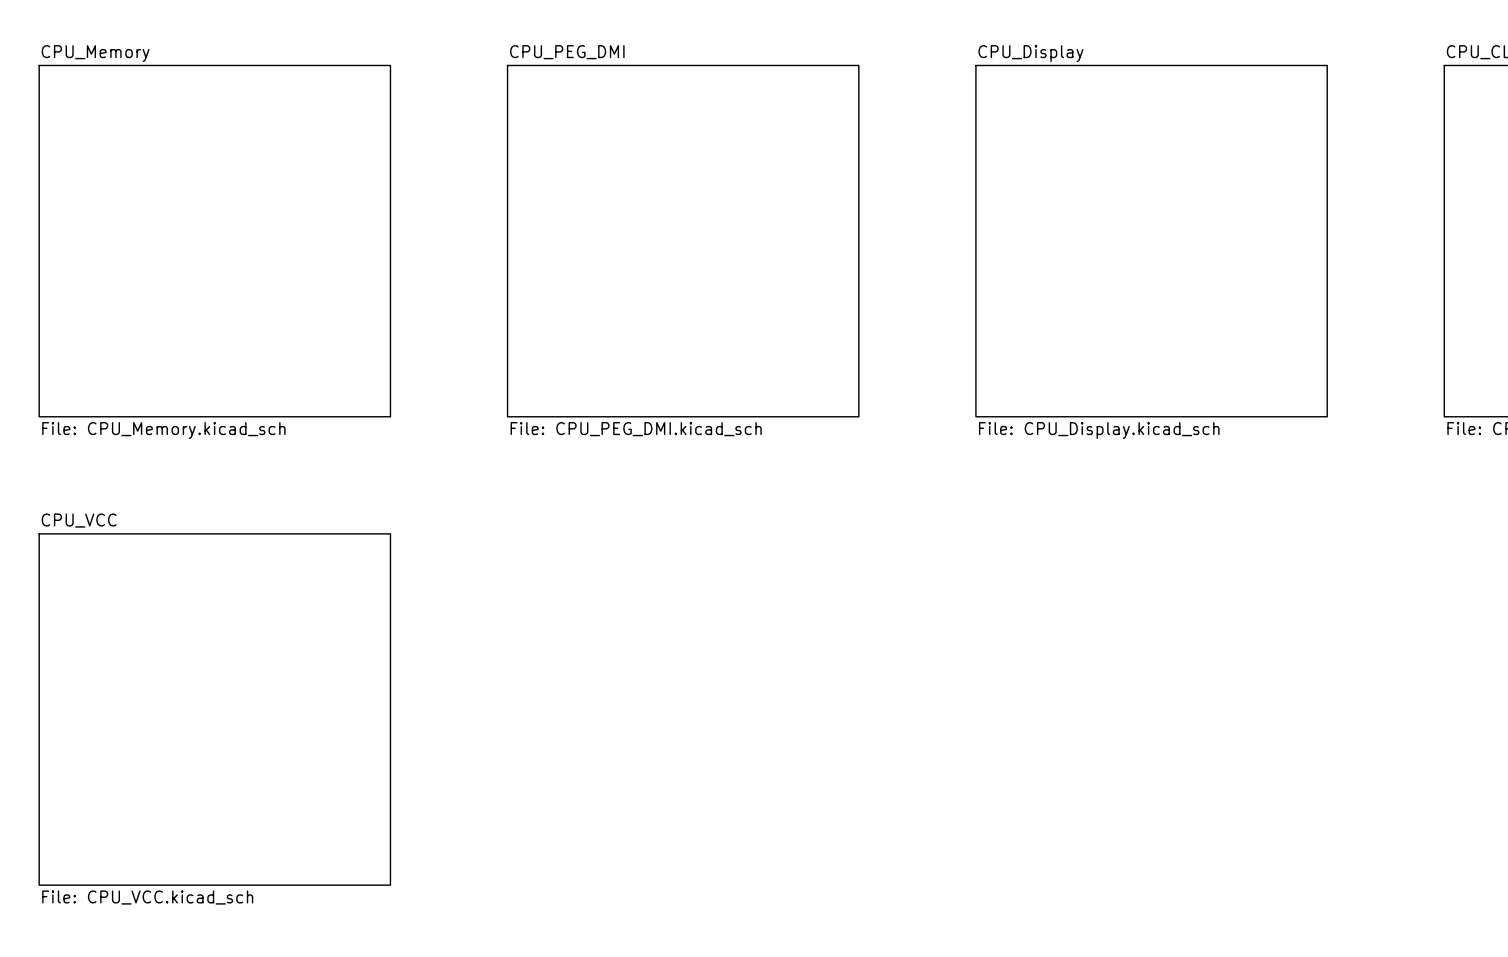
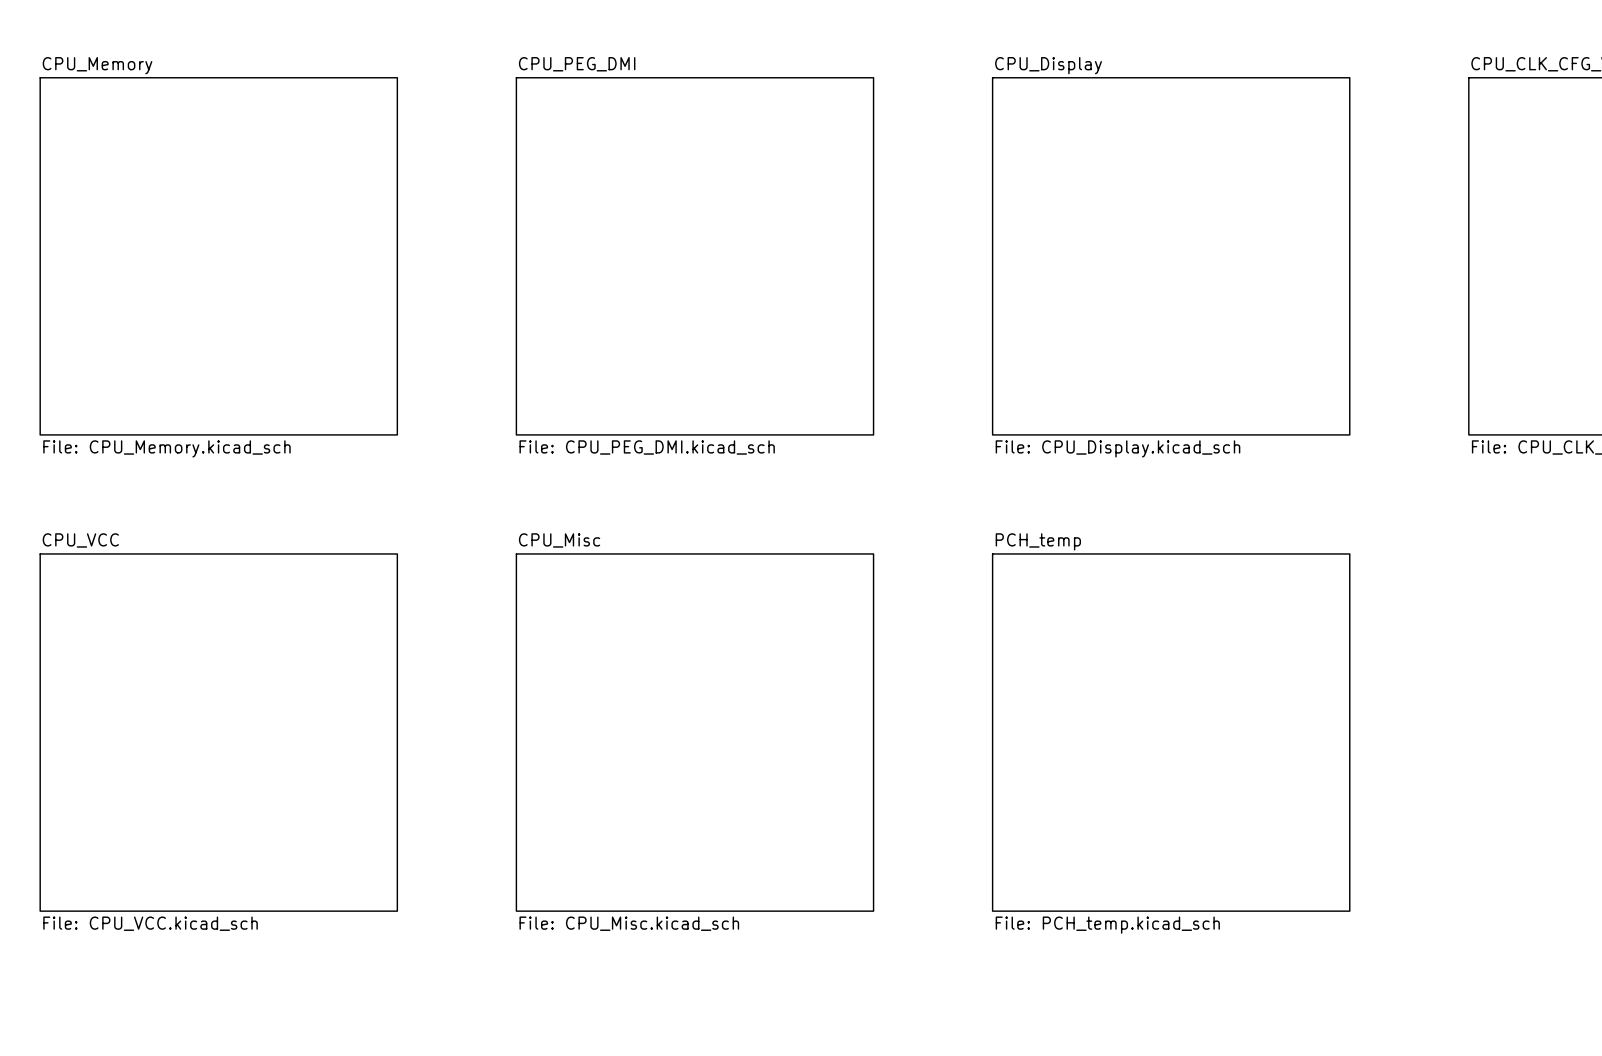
sheet CPU_Misc: none -> File: CPU_Misc.kicad_sch (694, 732)
sheet PCH_temp: none -> File: PCH_temp.kicad_sch (1171, 732)

